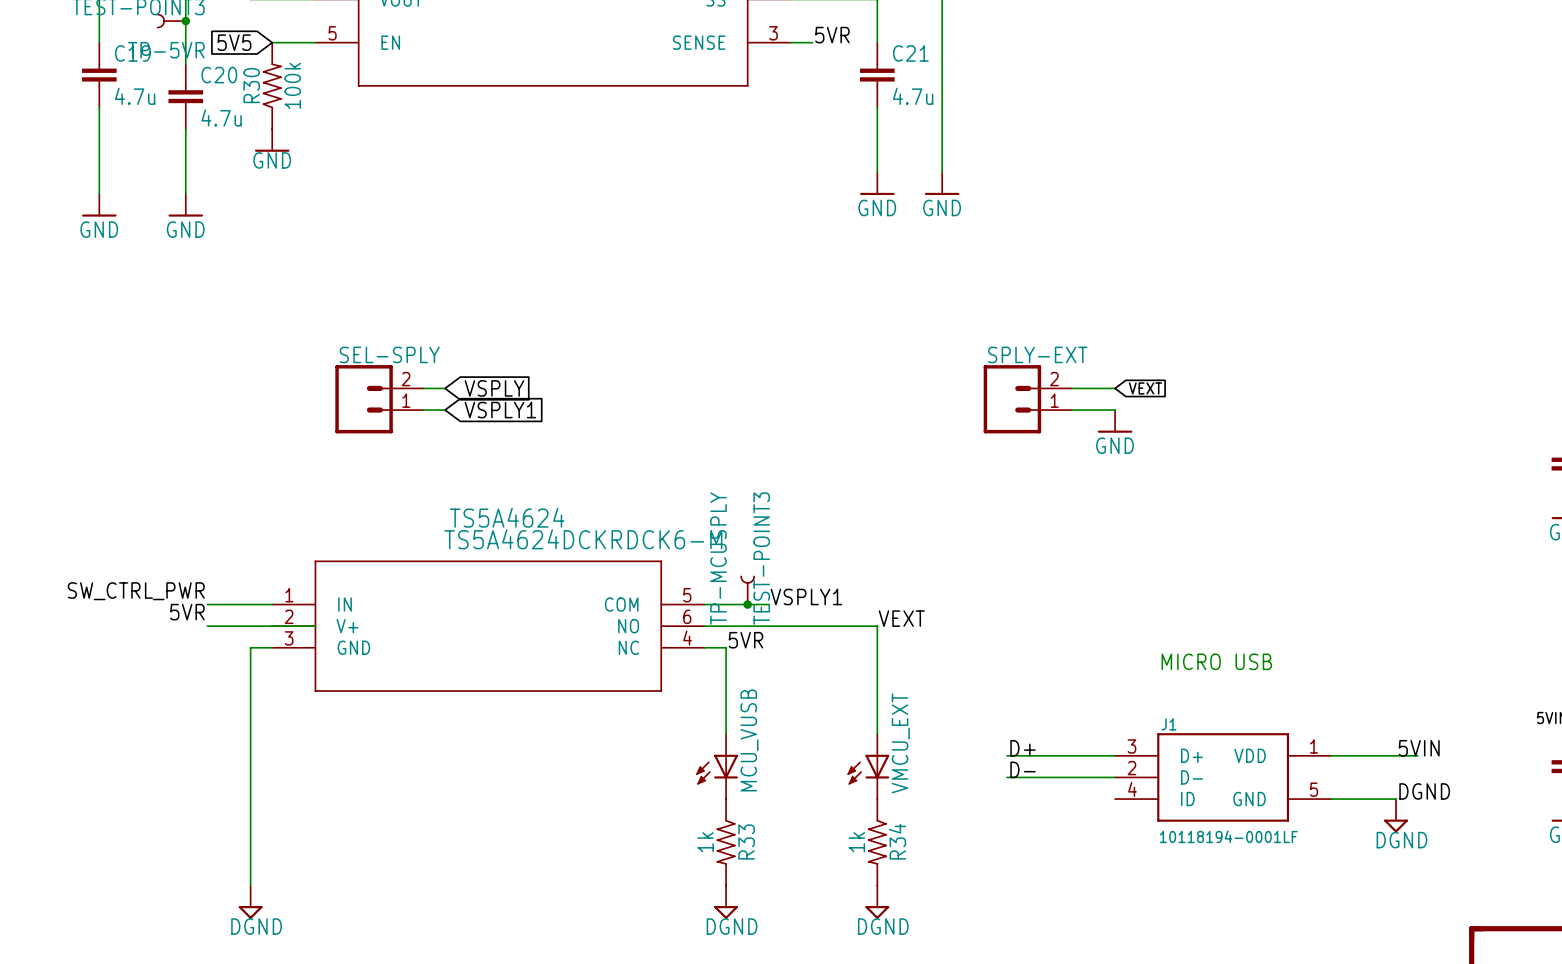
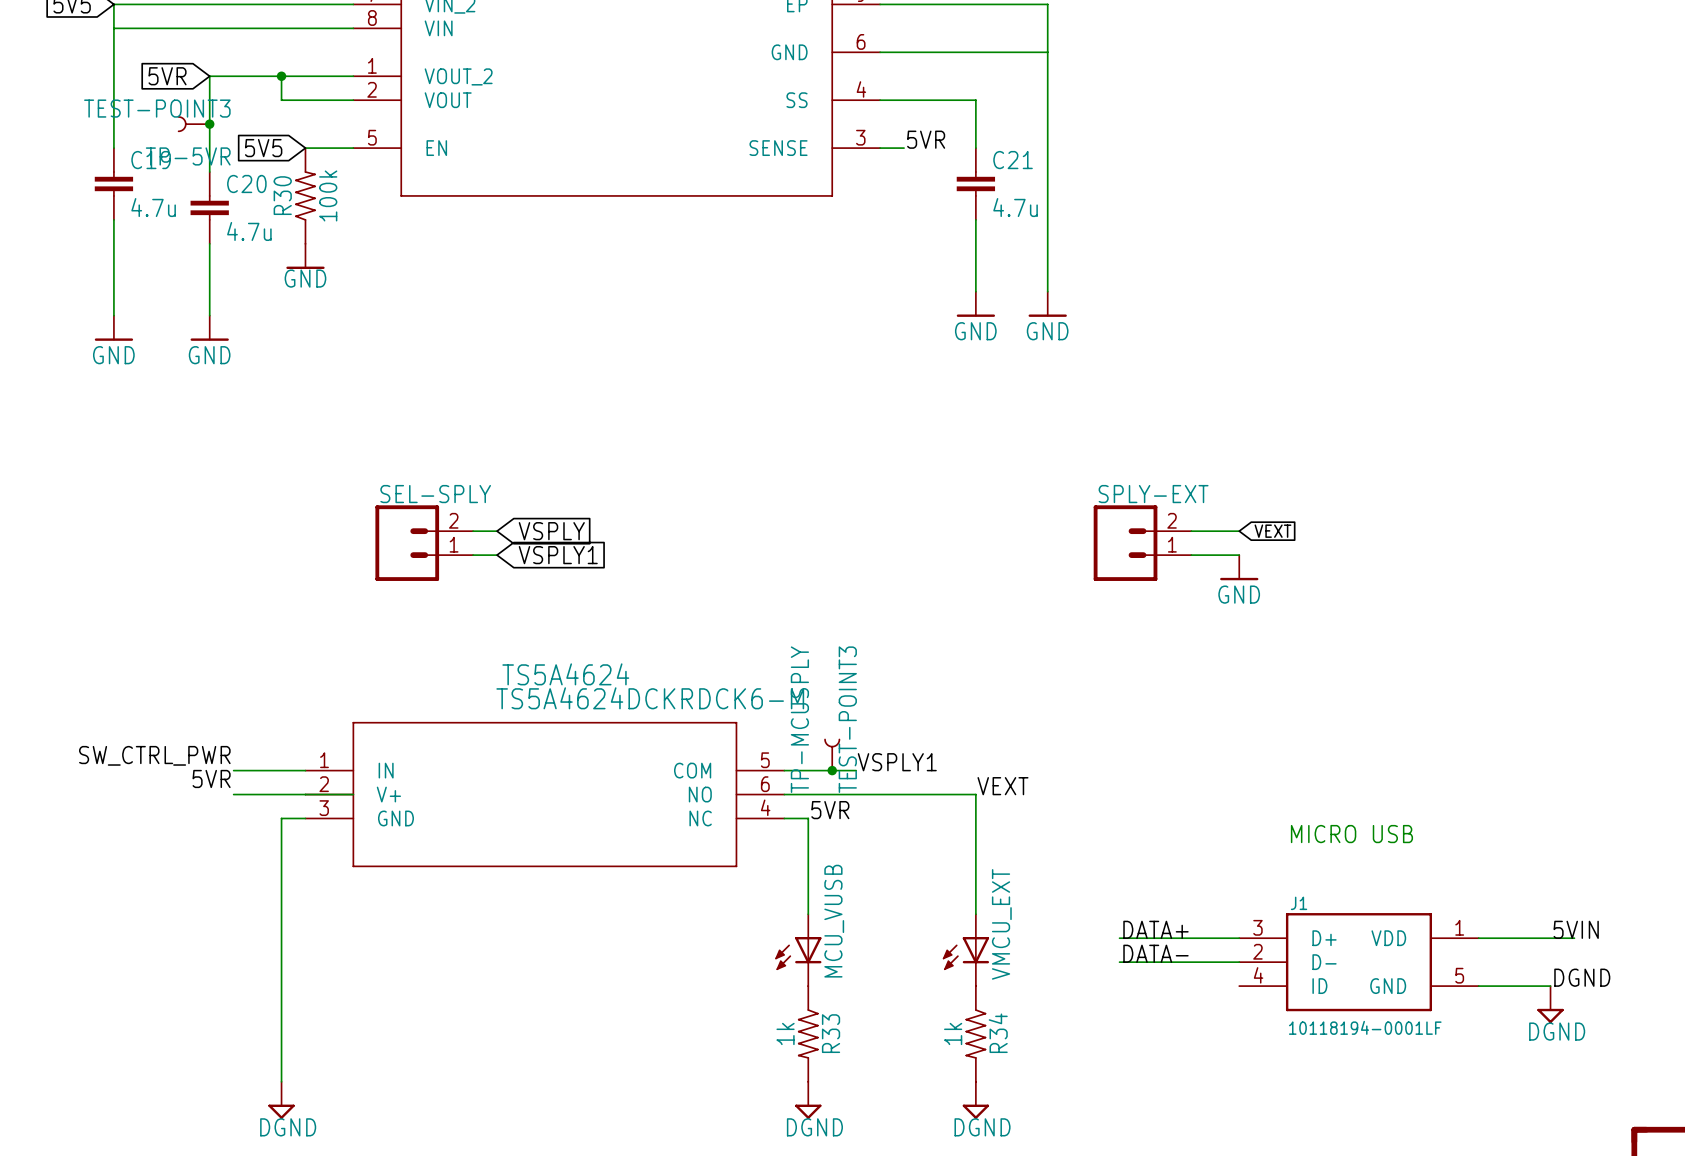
label: D+ (1023, 748) -> DATA+ (1155, 929)
label: D- (1023, 769) -> DATA- (1155, 953)

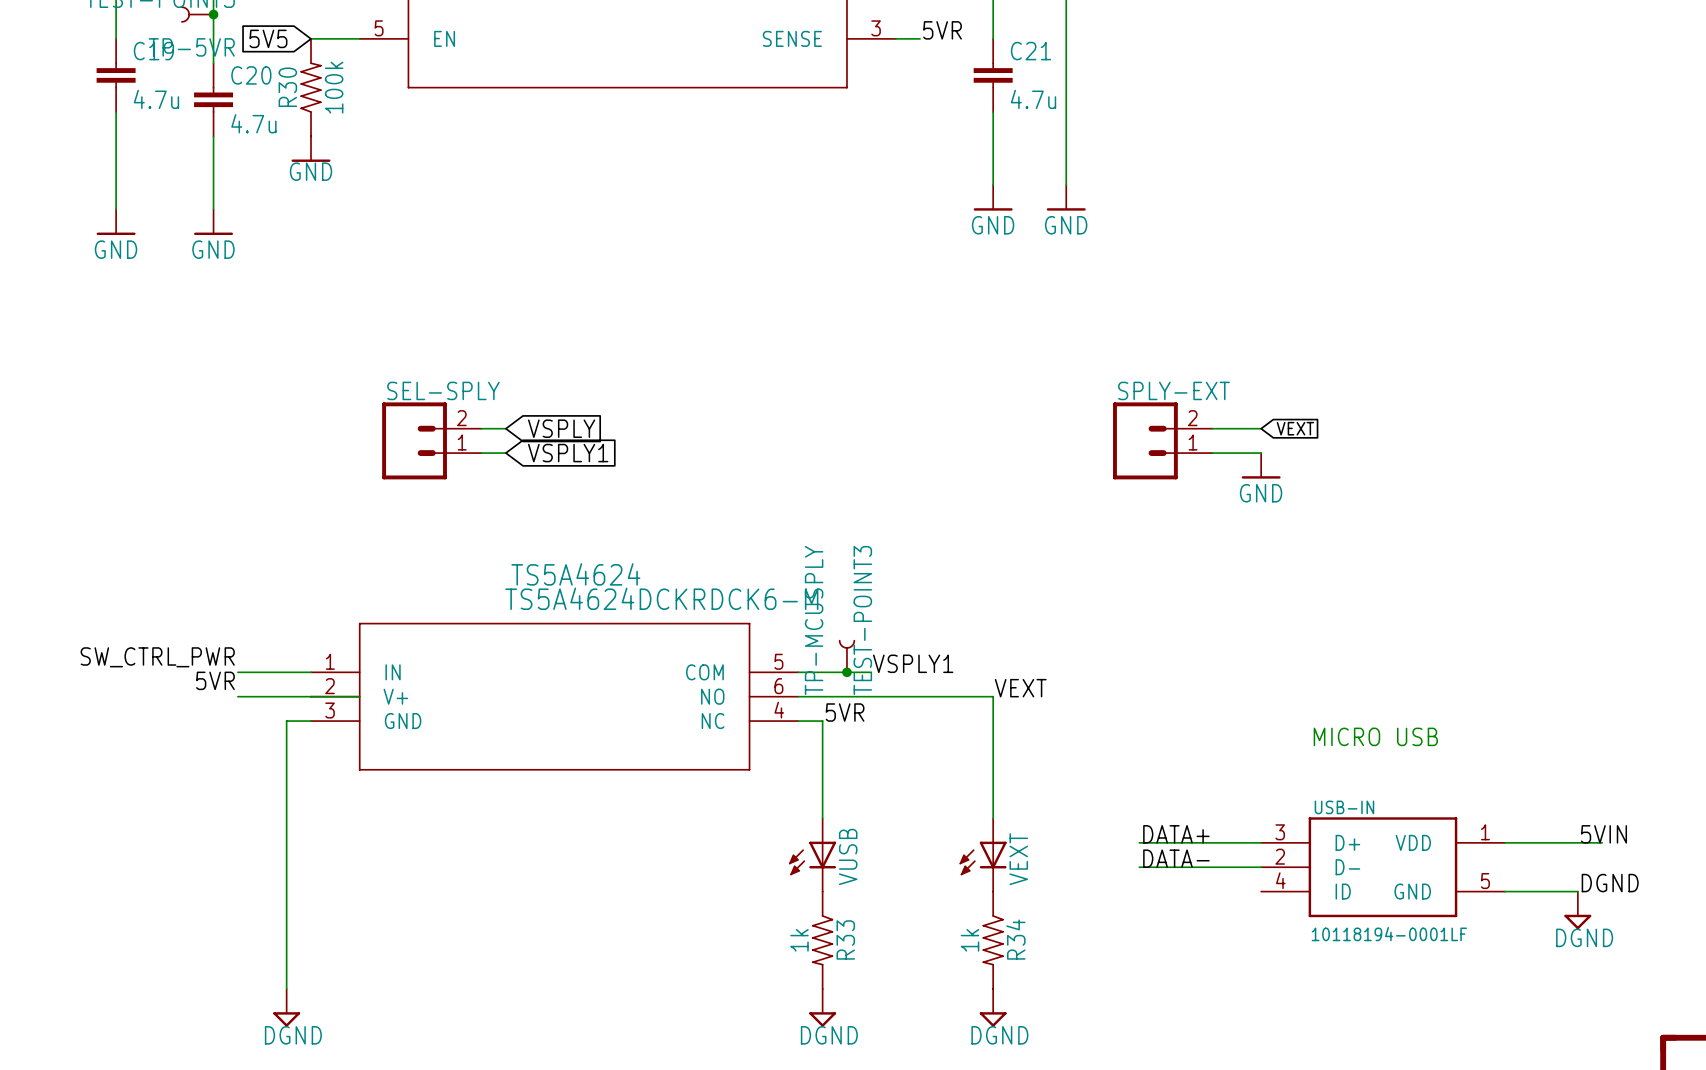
J1 name: J1 (1299, 903) -> USB-IN (1344, 807)
MCU_VUSB name: MCU_VUSB (834, 921) -> VUSB (848, 856)
VMCU_EXT name: VMCU_EXT (1001, 924) -> VEXT (1018, 859)

